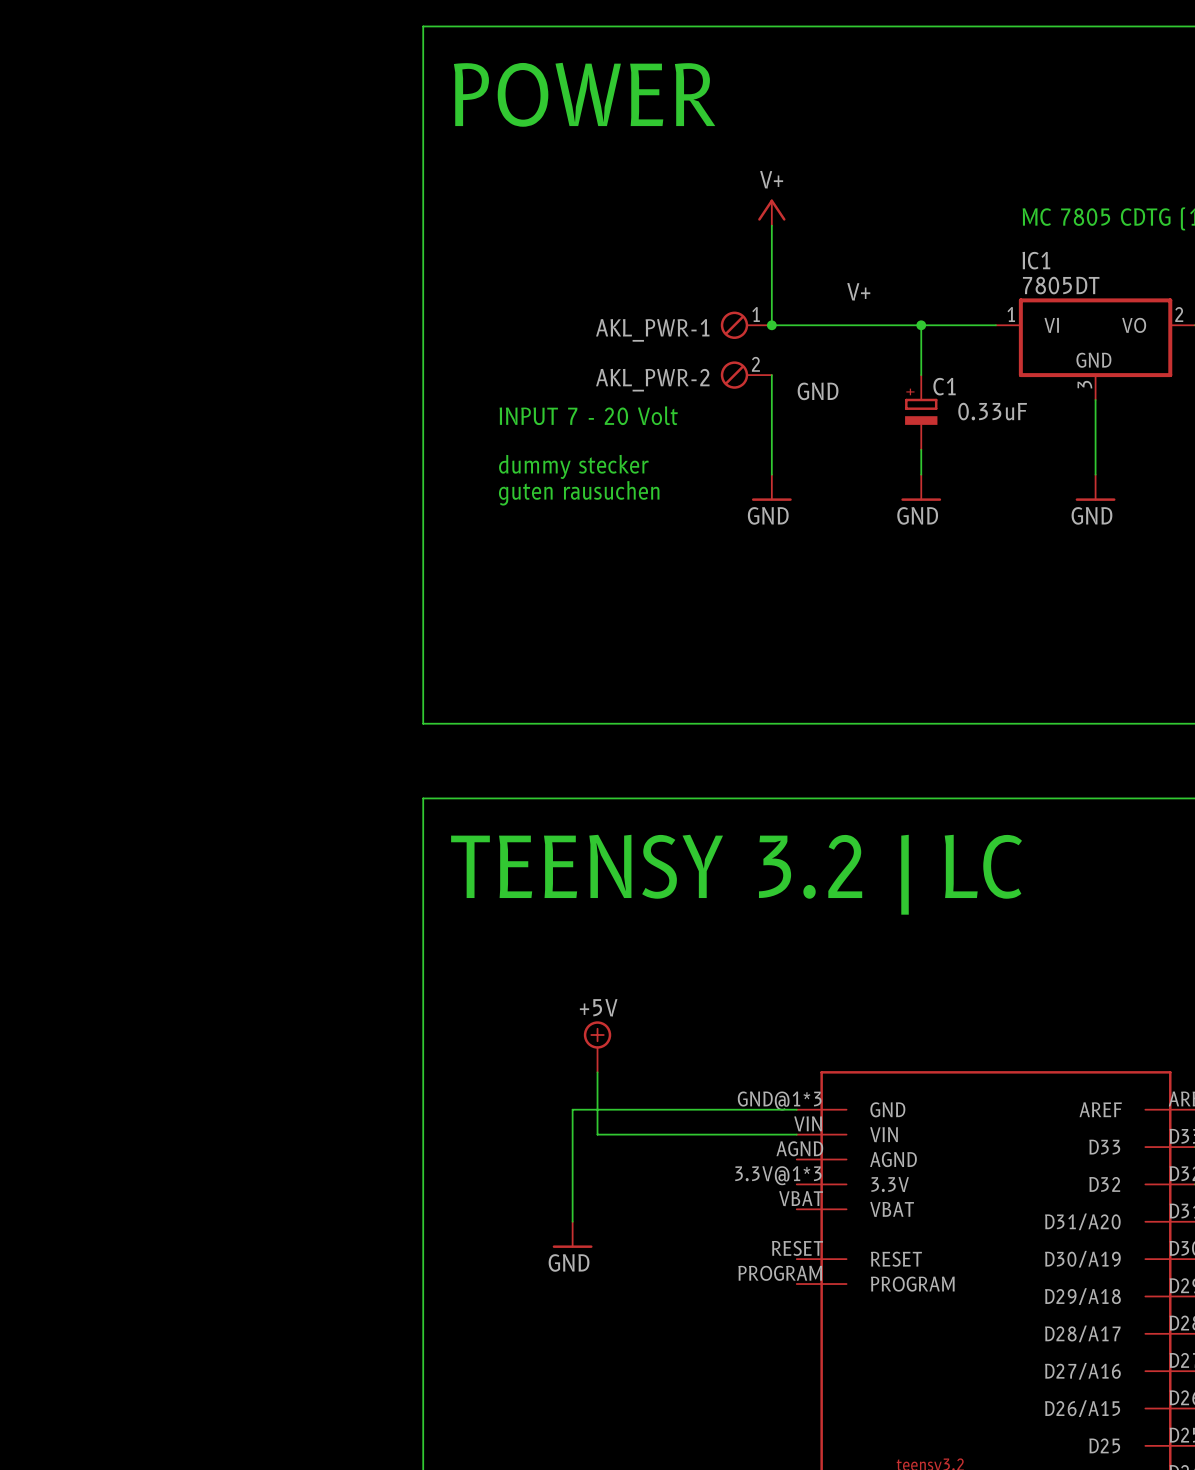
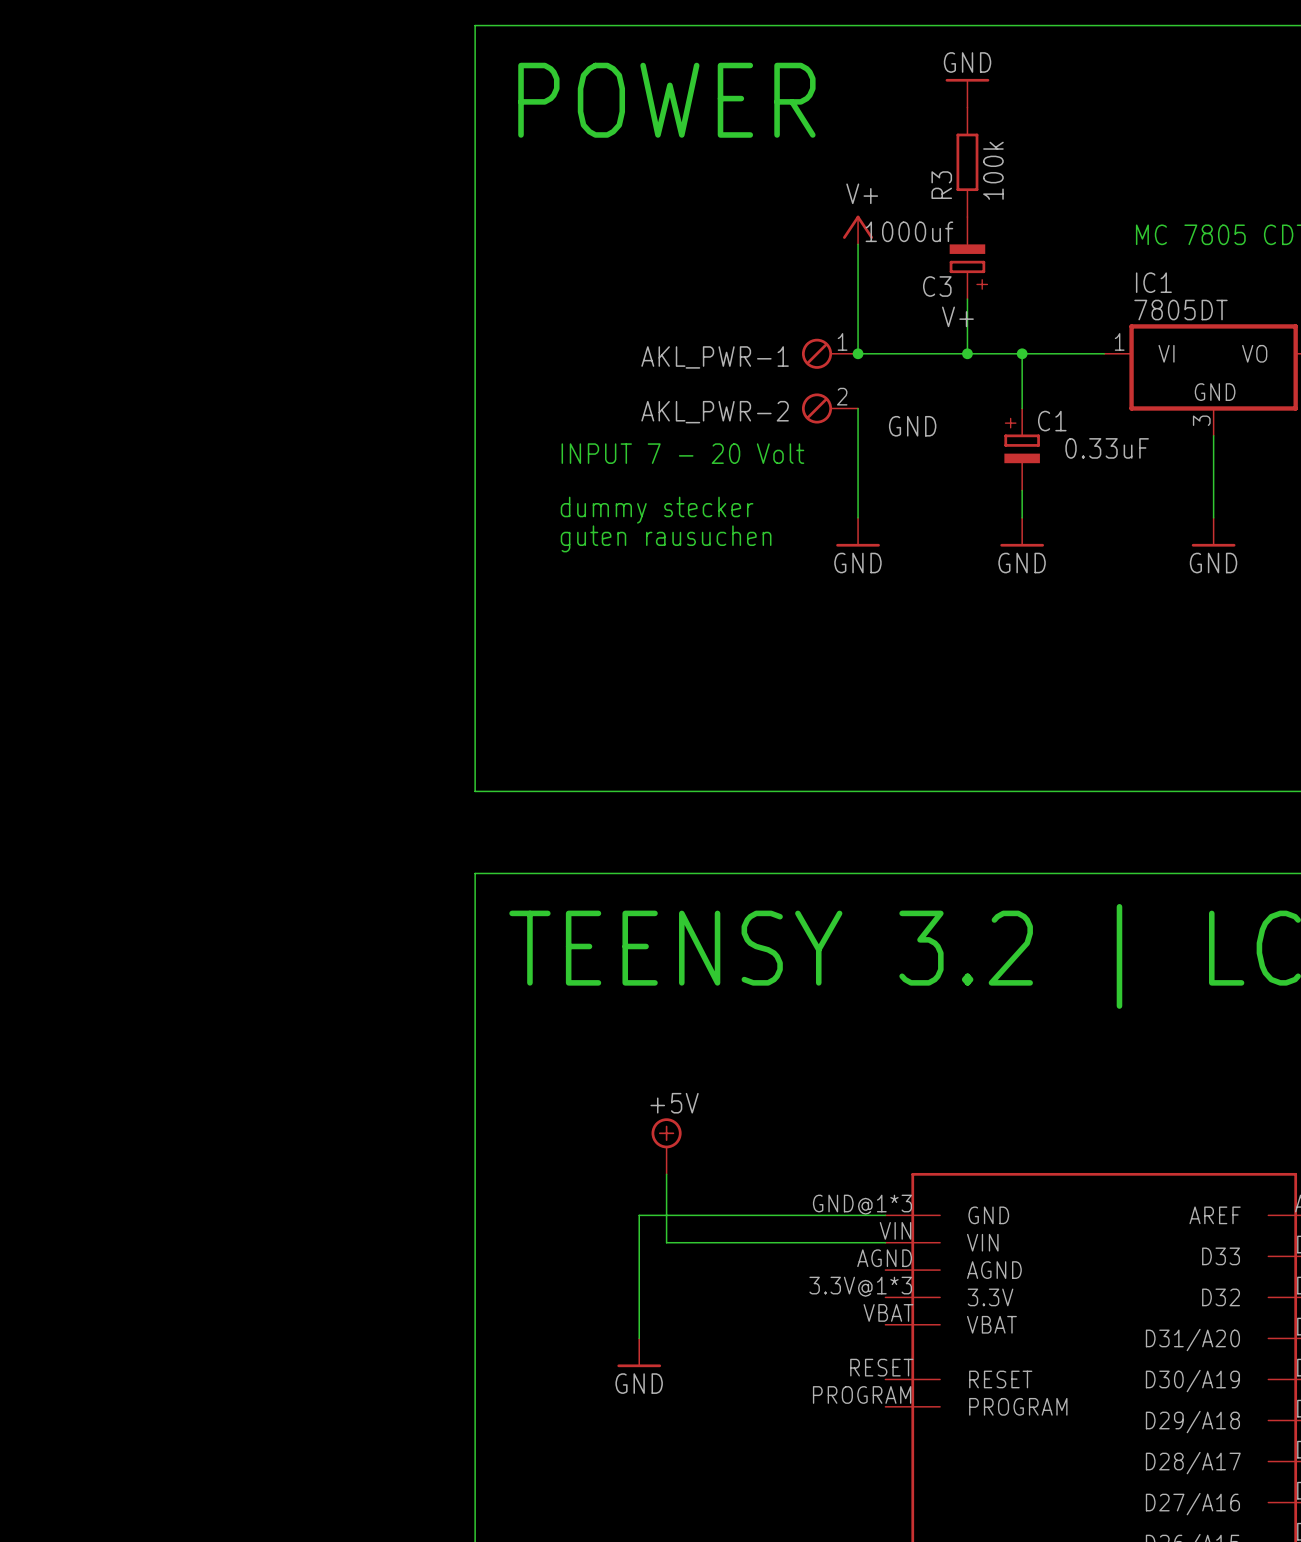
power symbol: none -> GND (967, 93)
R3: none -> 100k (967, 162)
C3: none -> 1000uf (967, 258)
wire: none -> (967, 299) (967, 353)
junction: none -> (967, 353)

